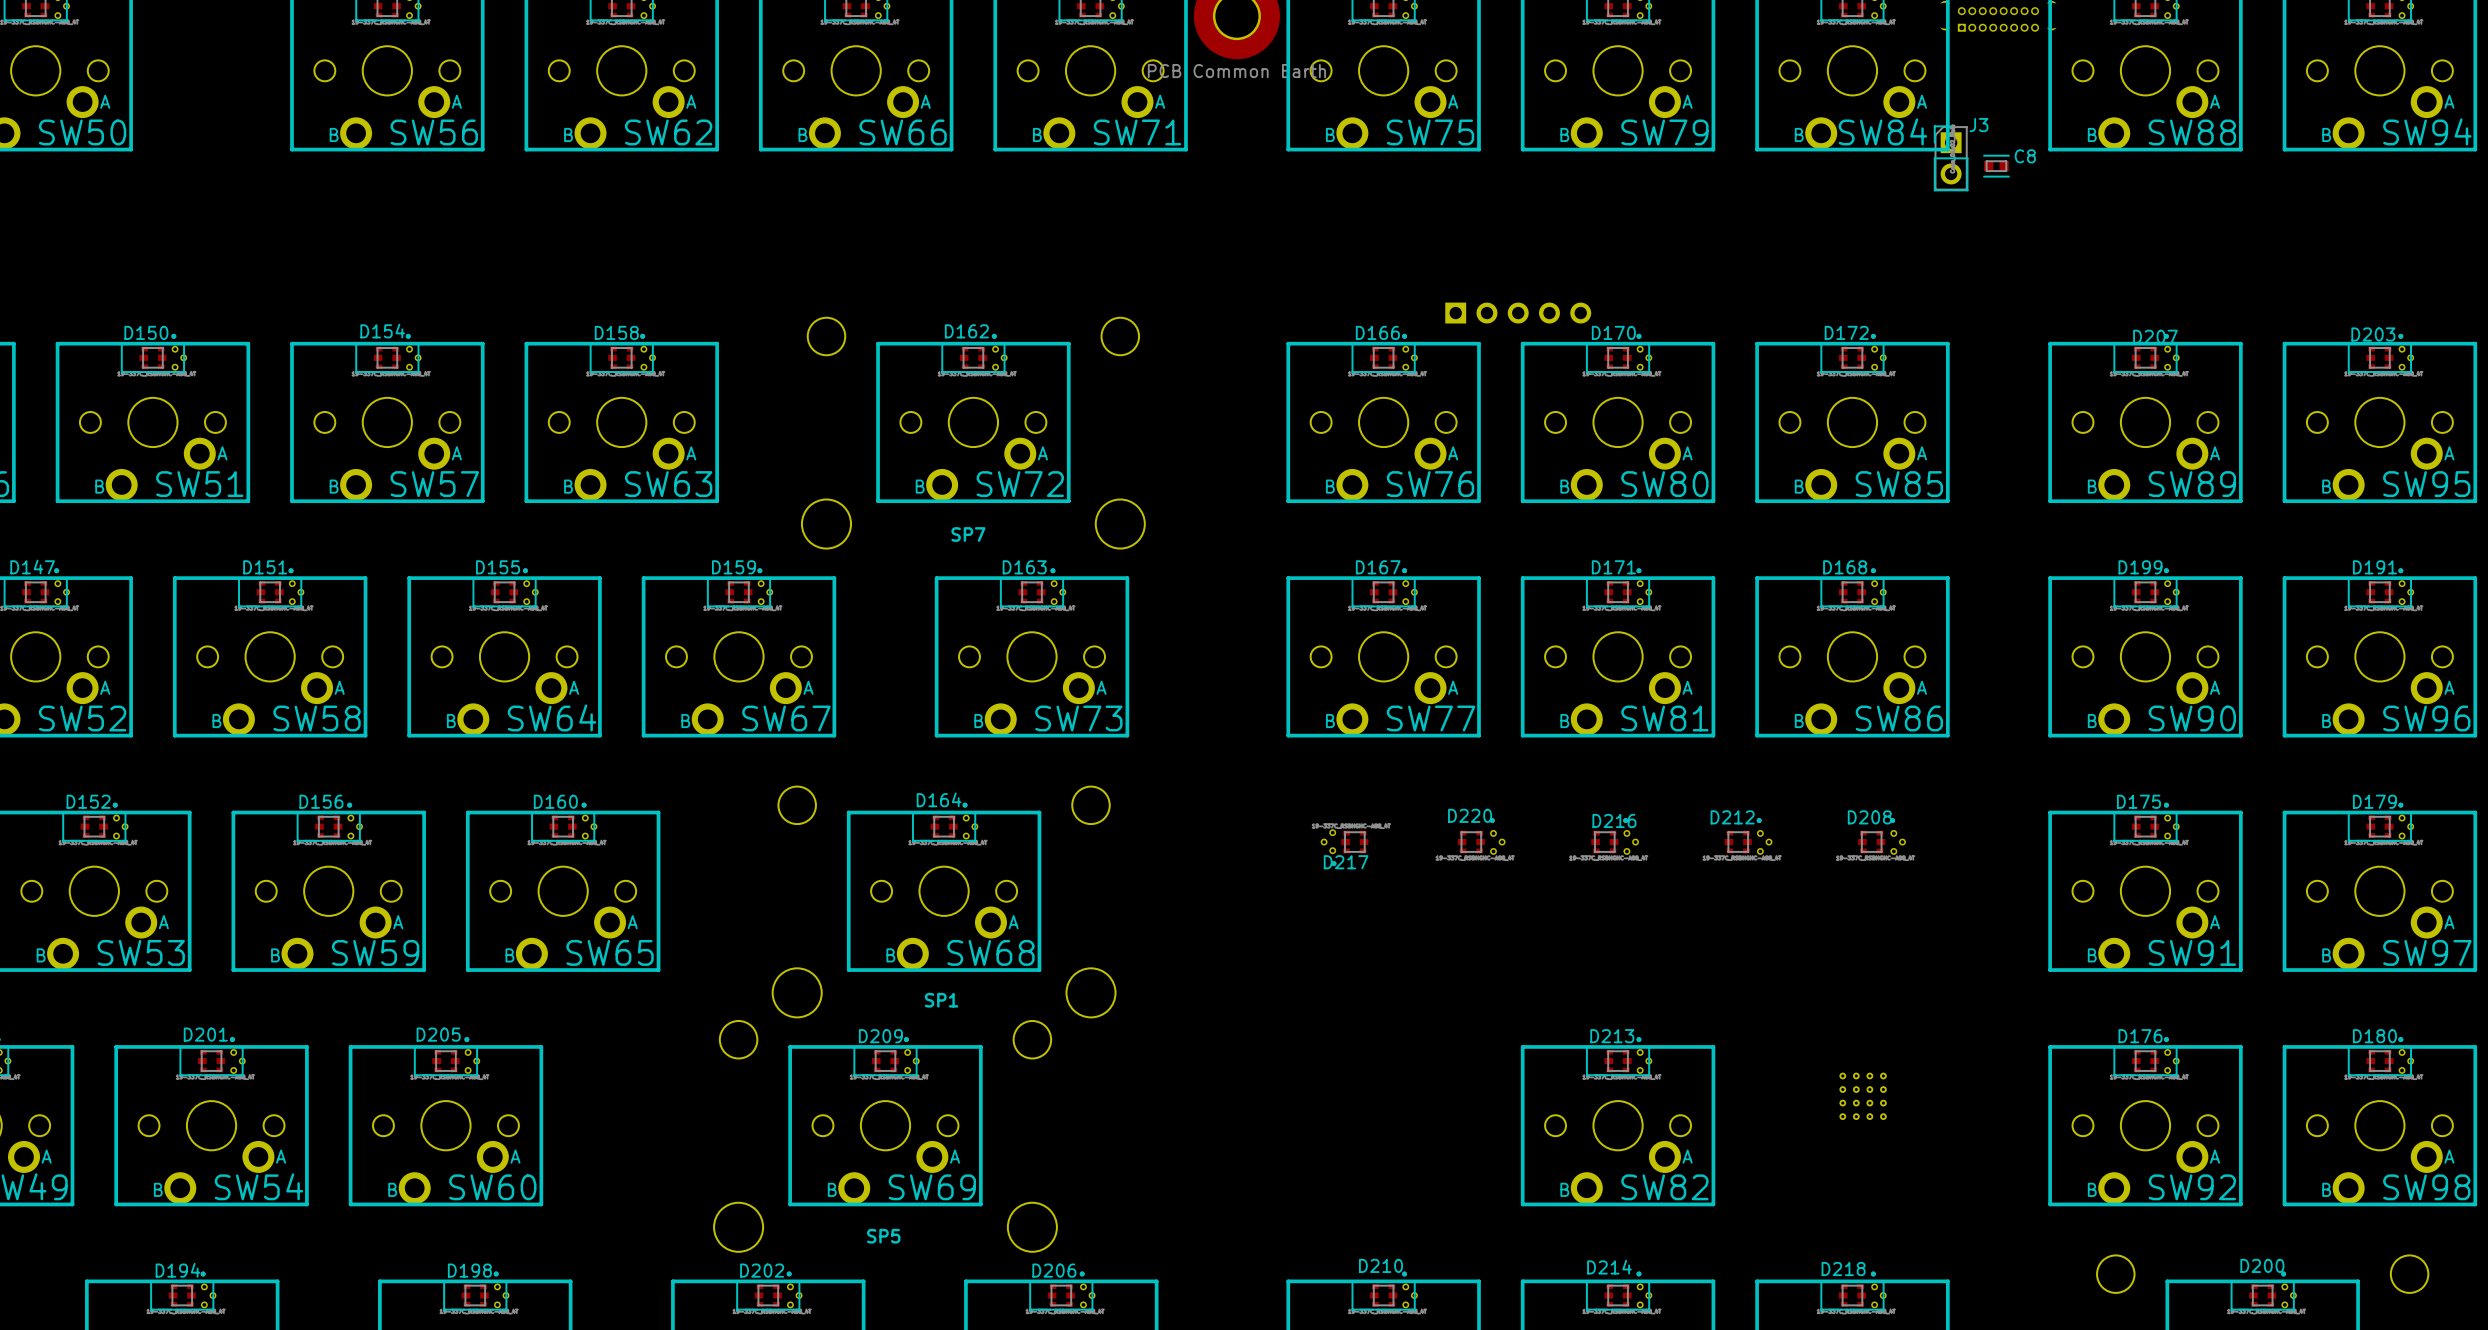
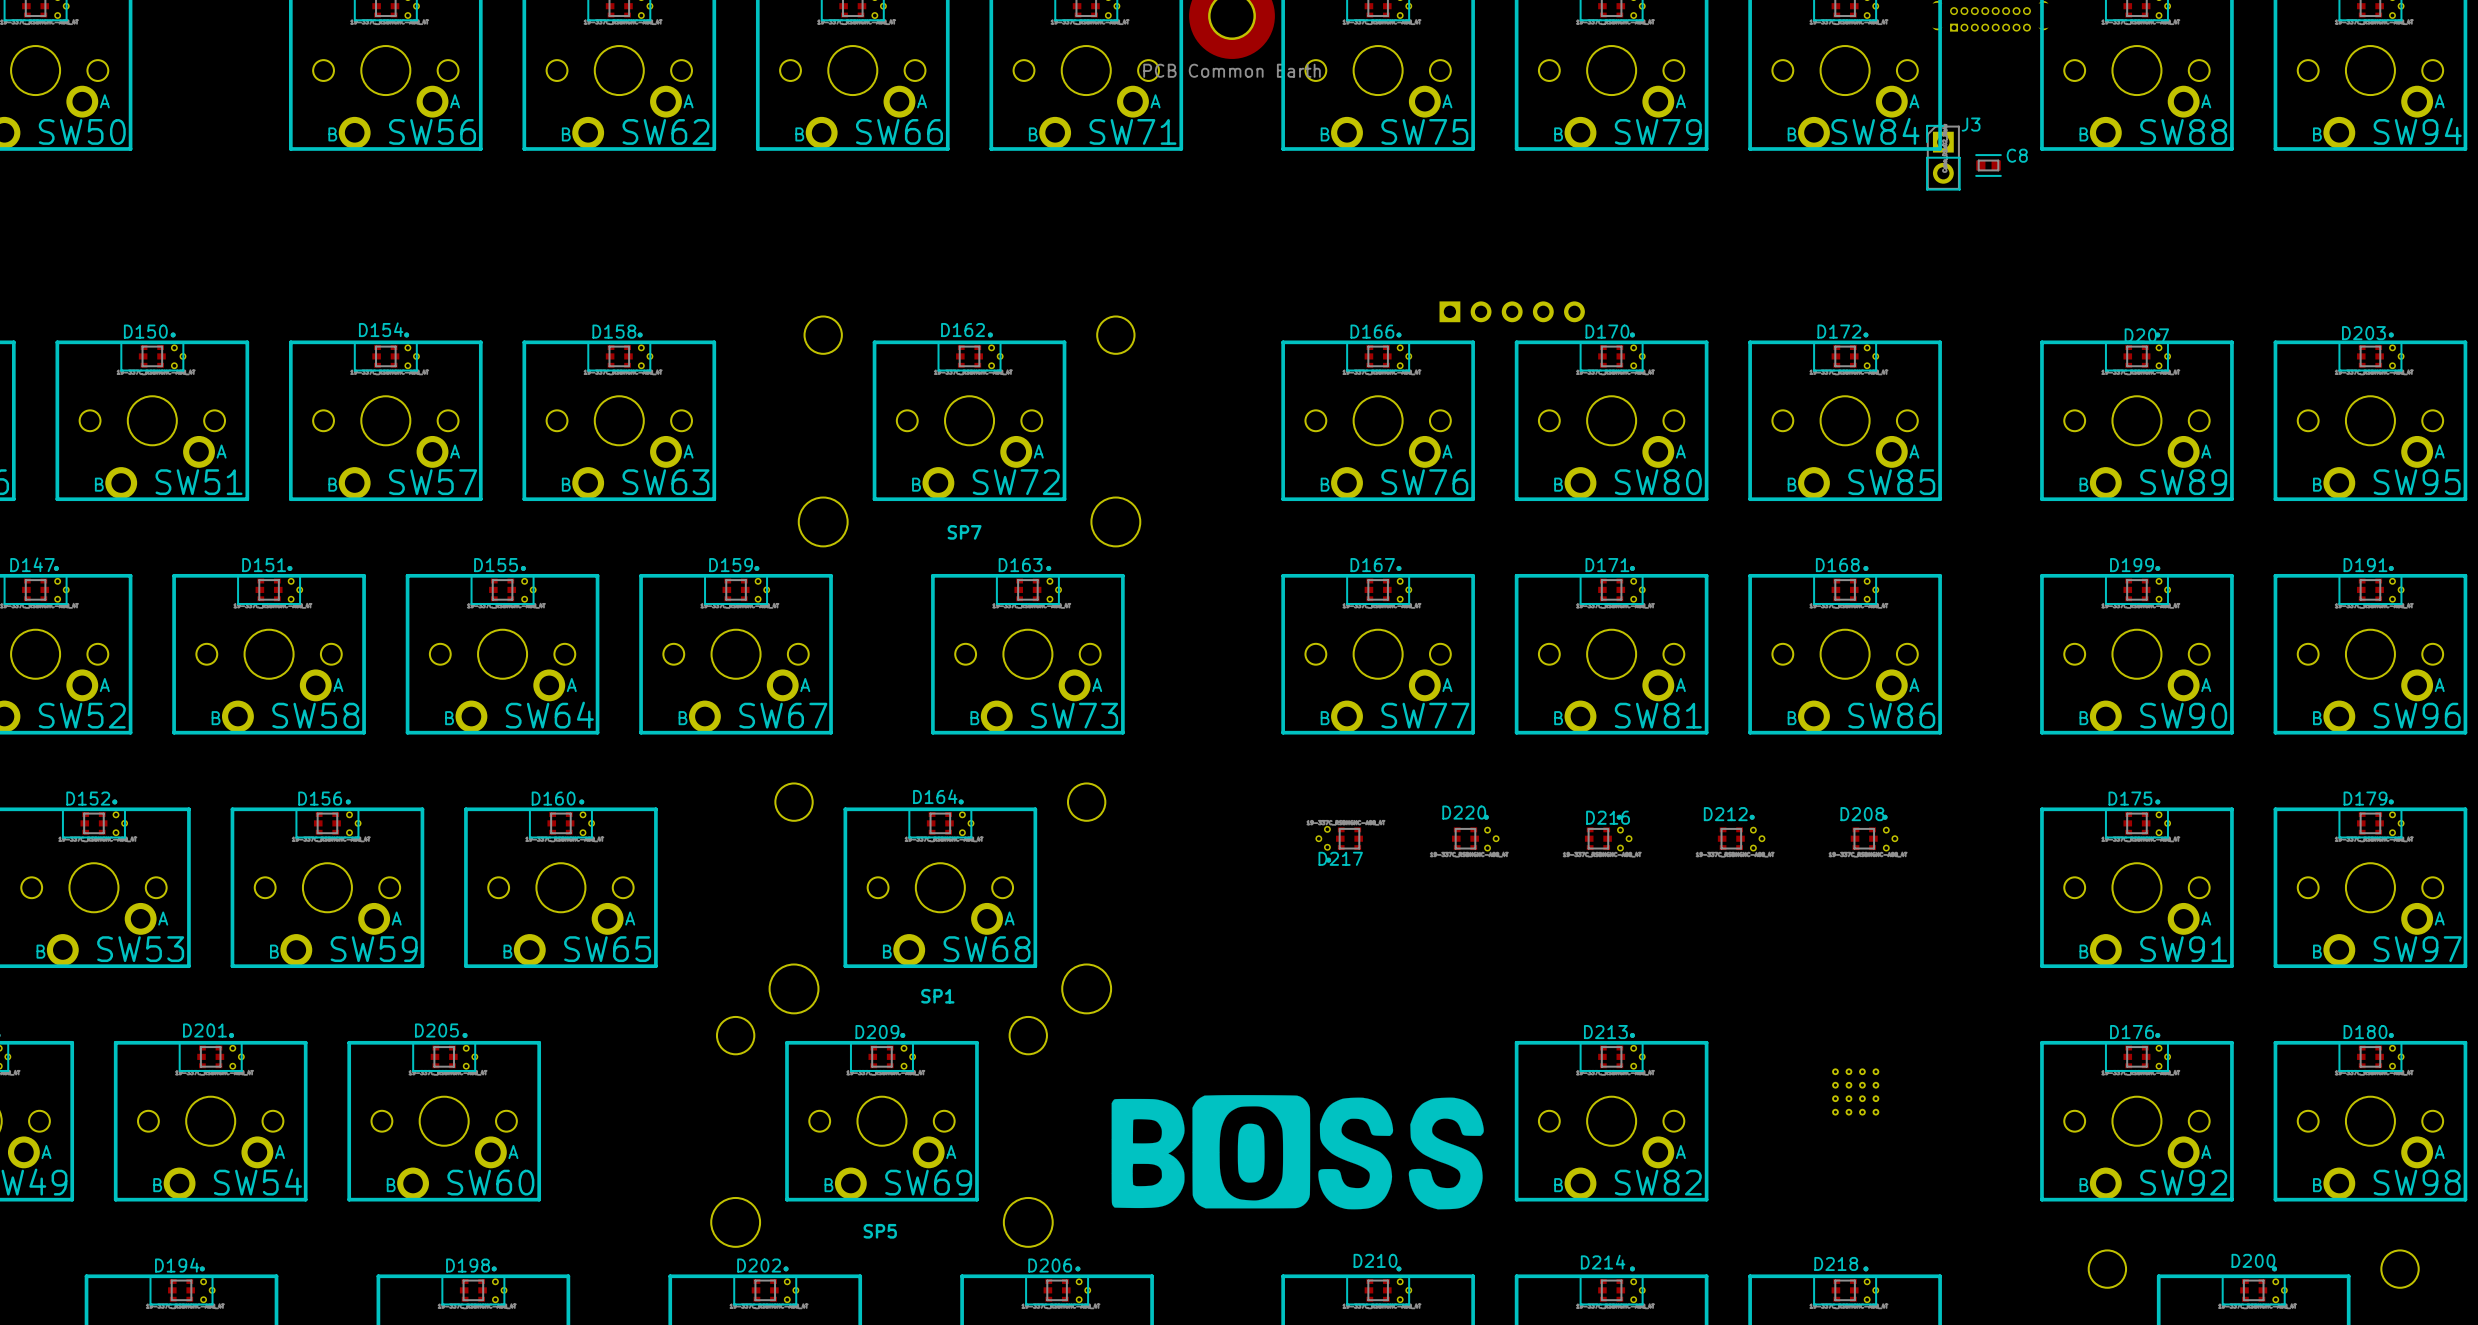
drawing: none -> [1111, 1095, 1484, 1210]

